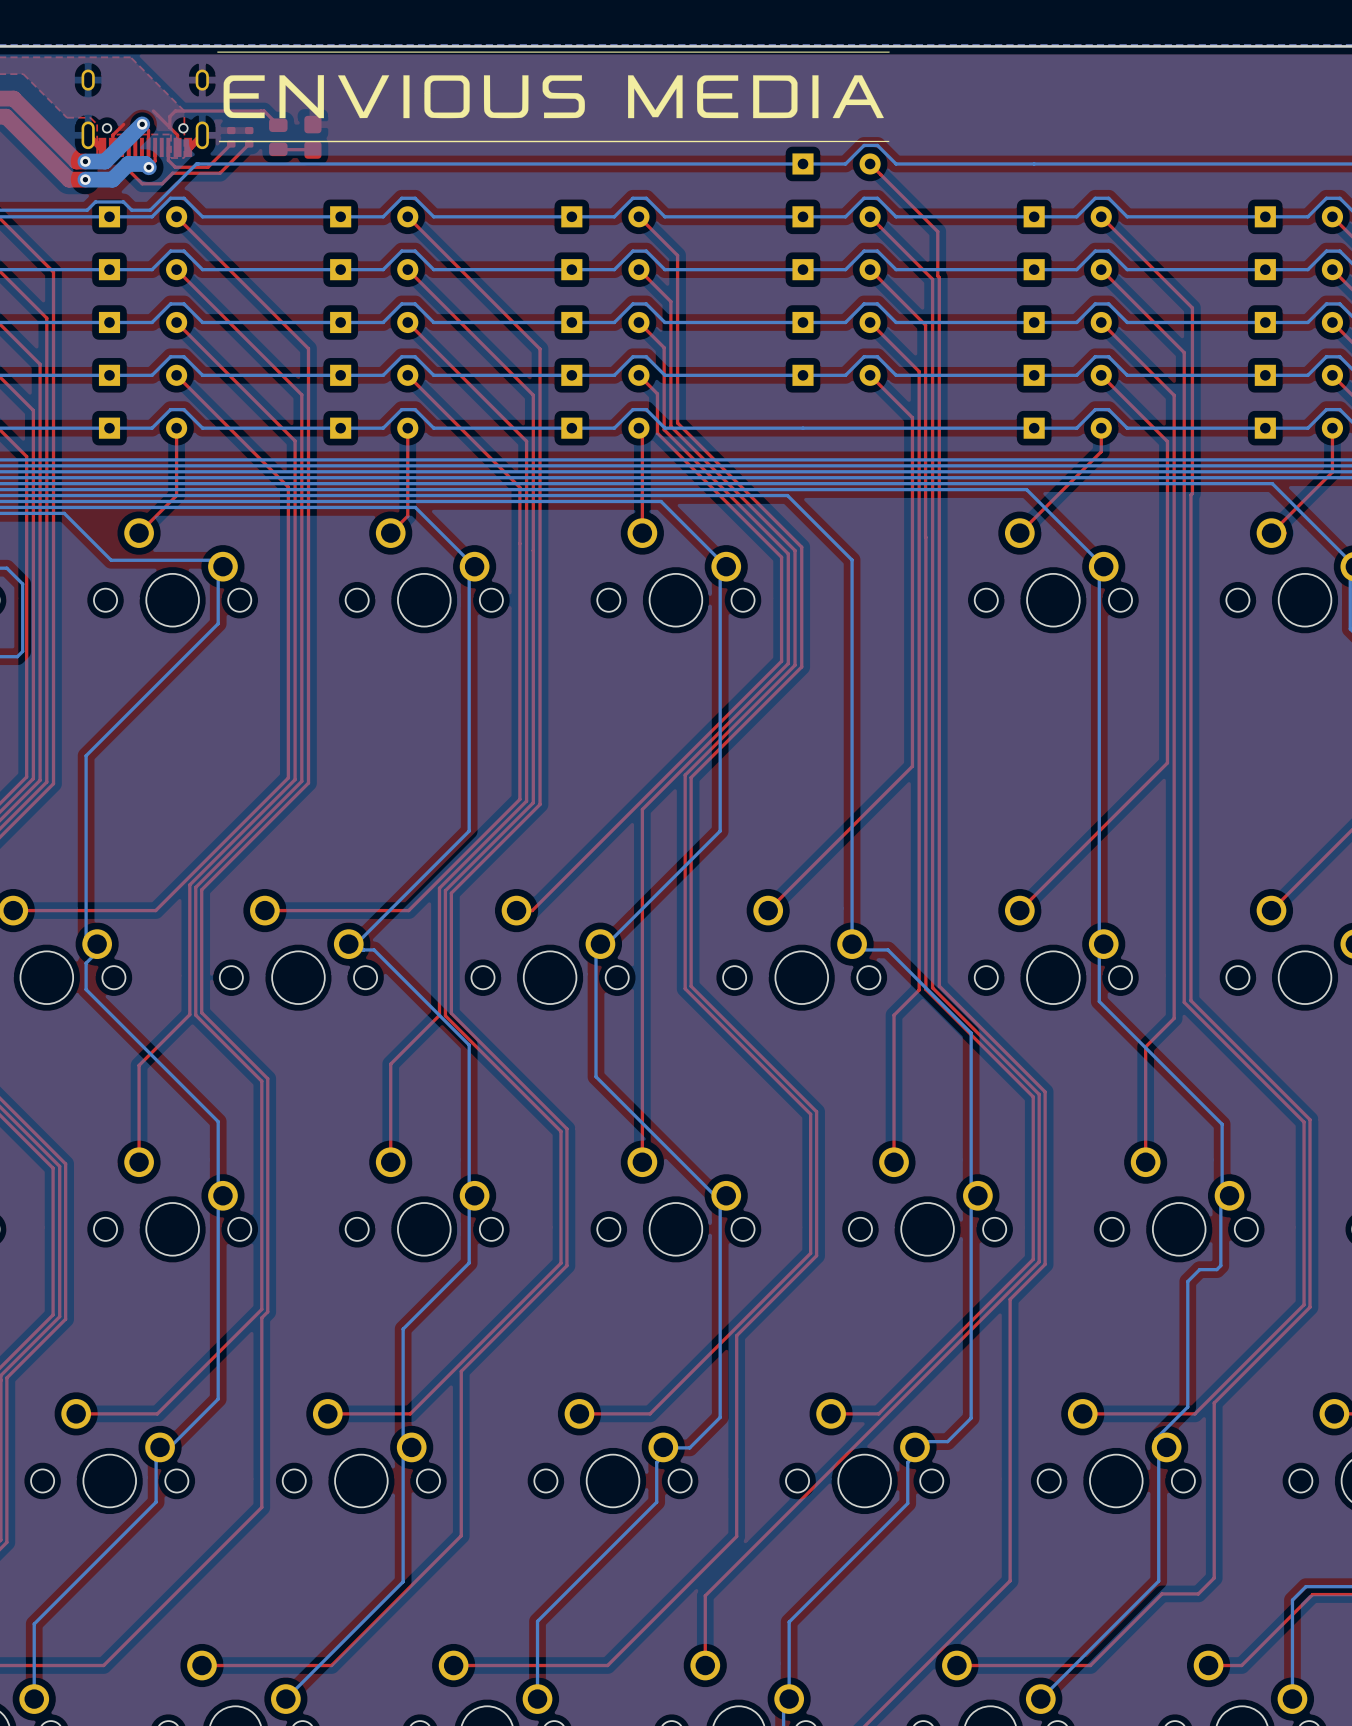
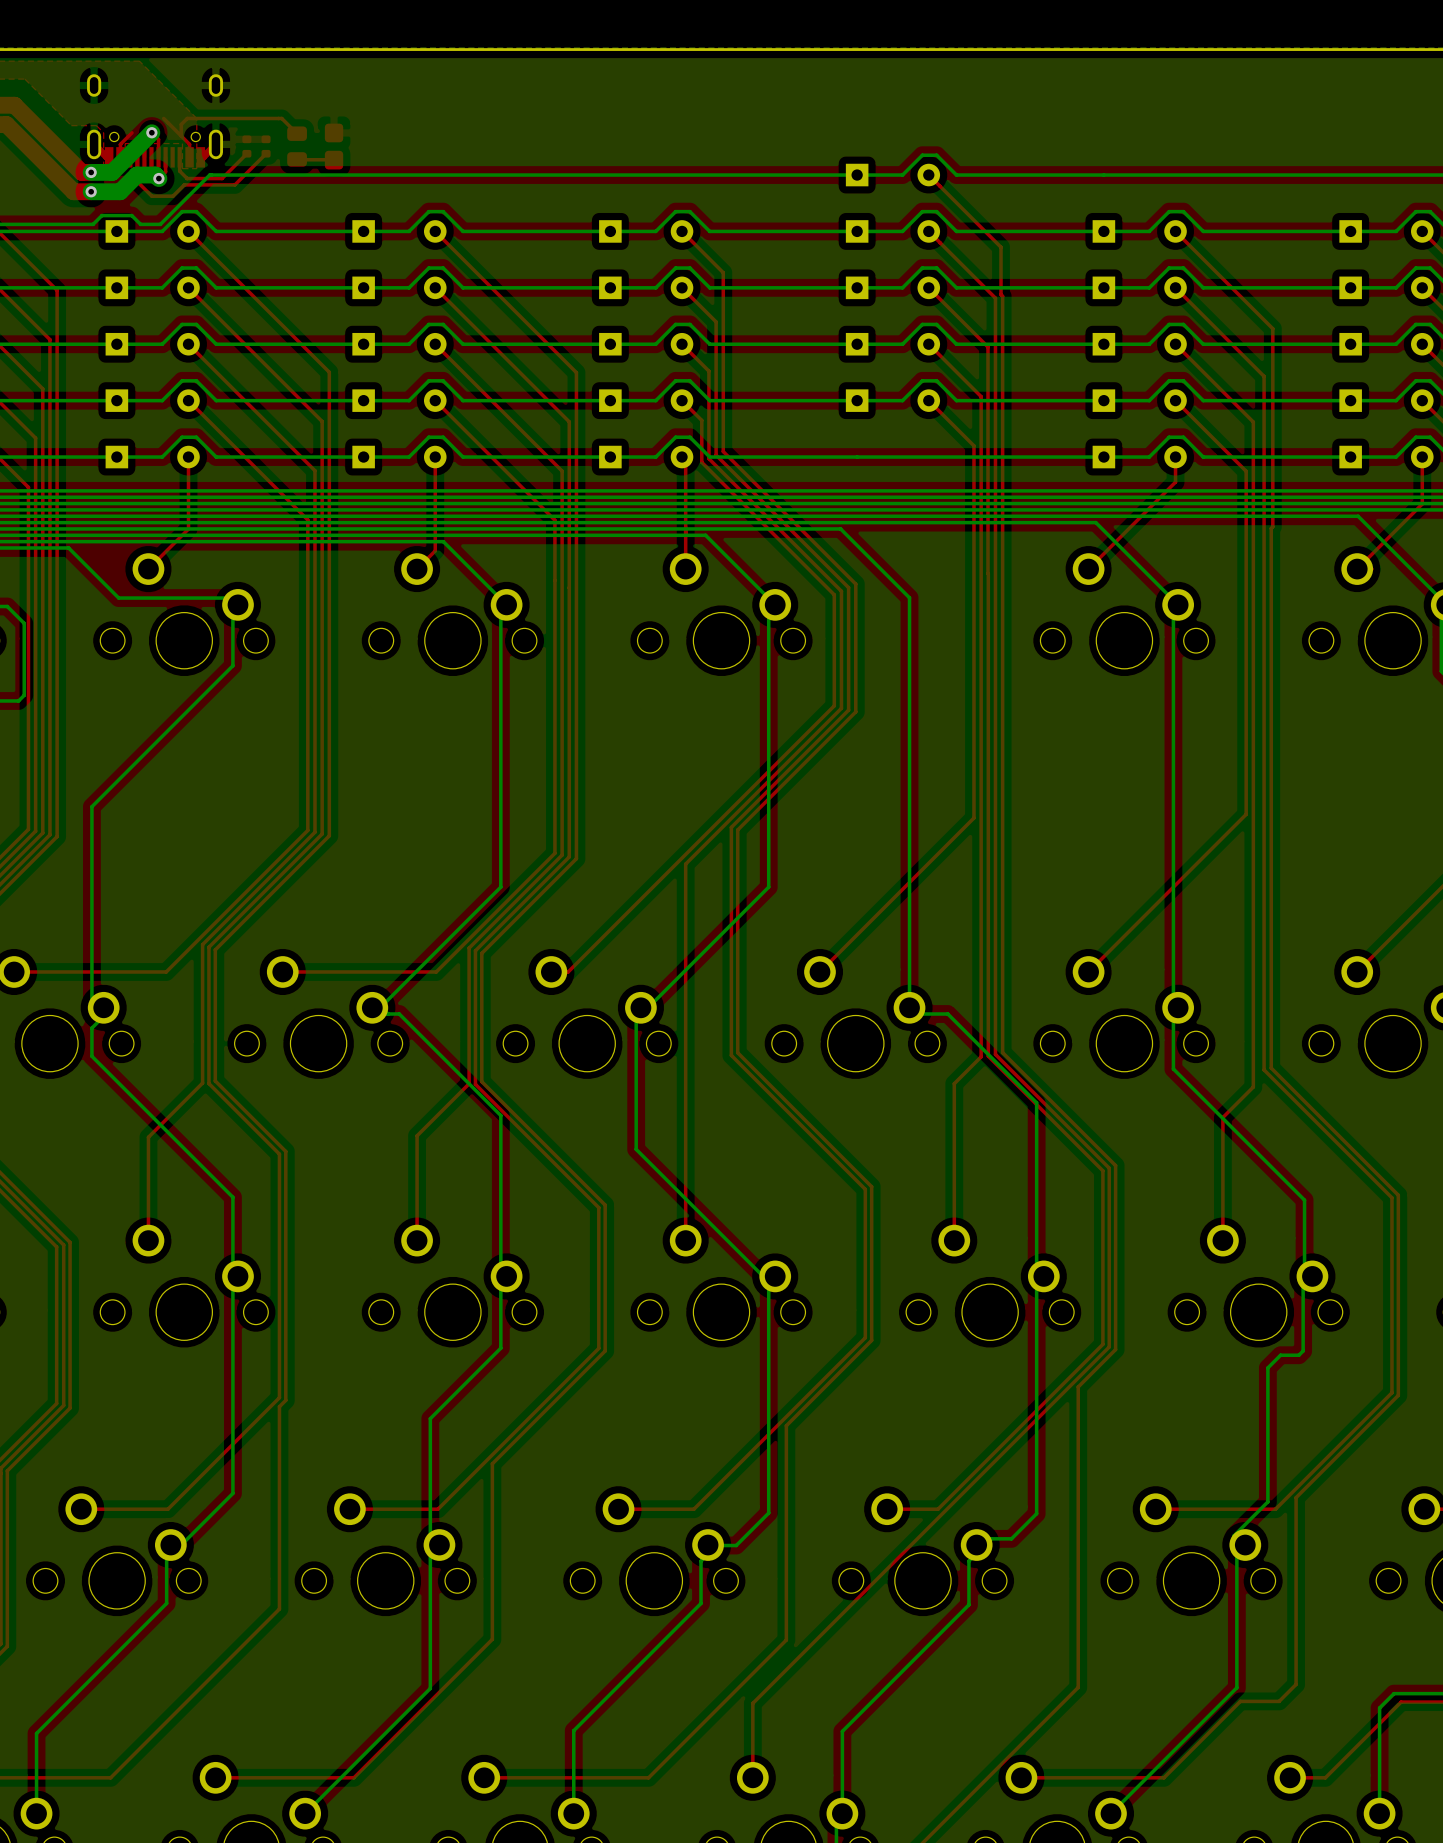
drawing: [217, 51, 890, 143] -> none

